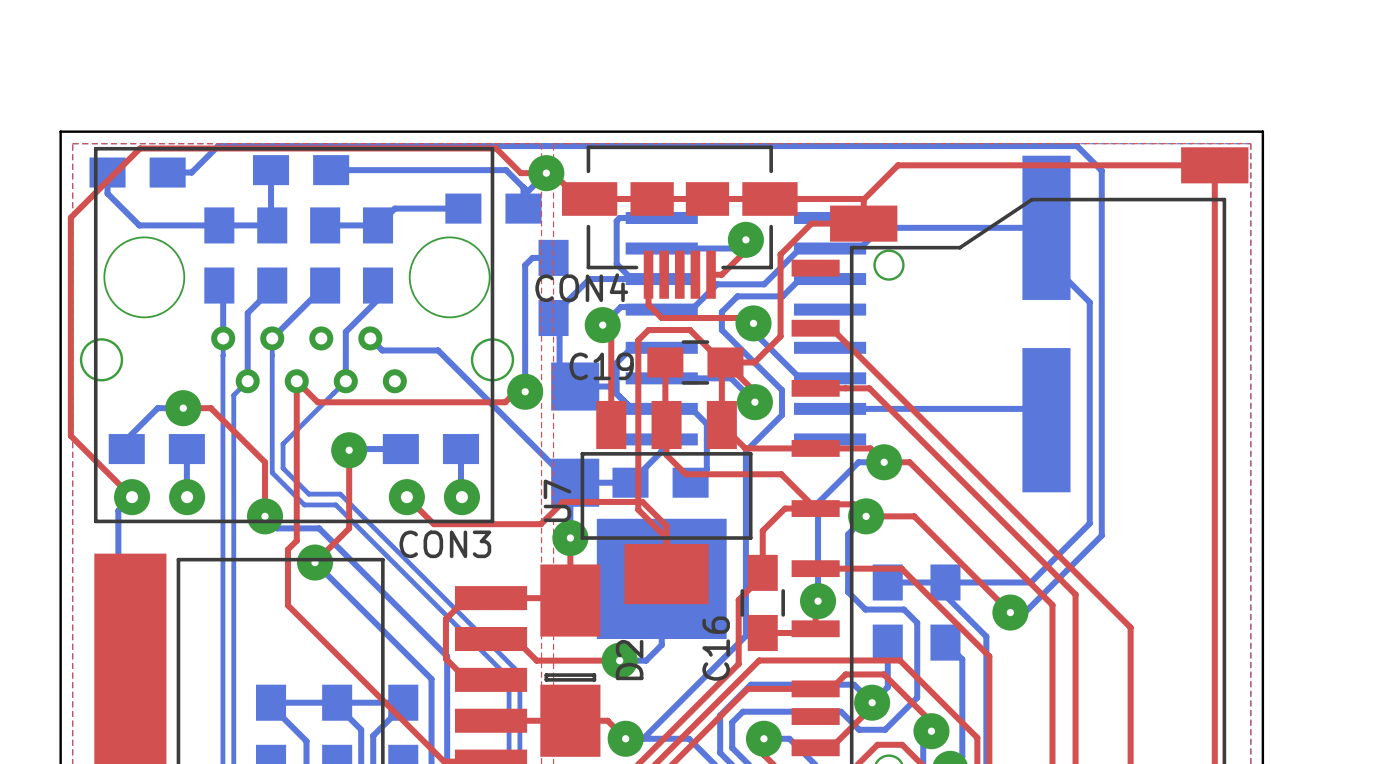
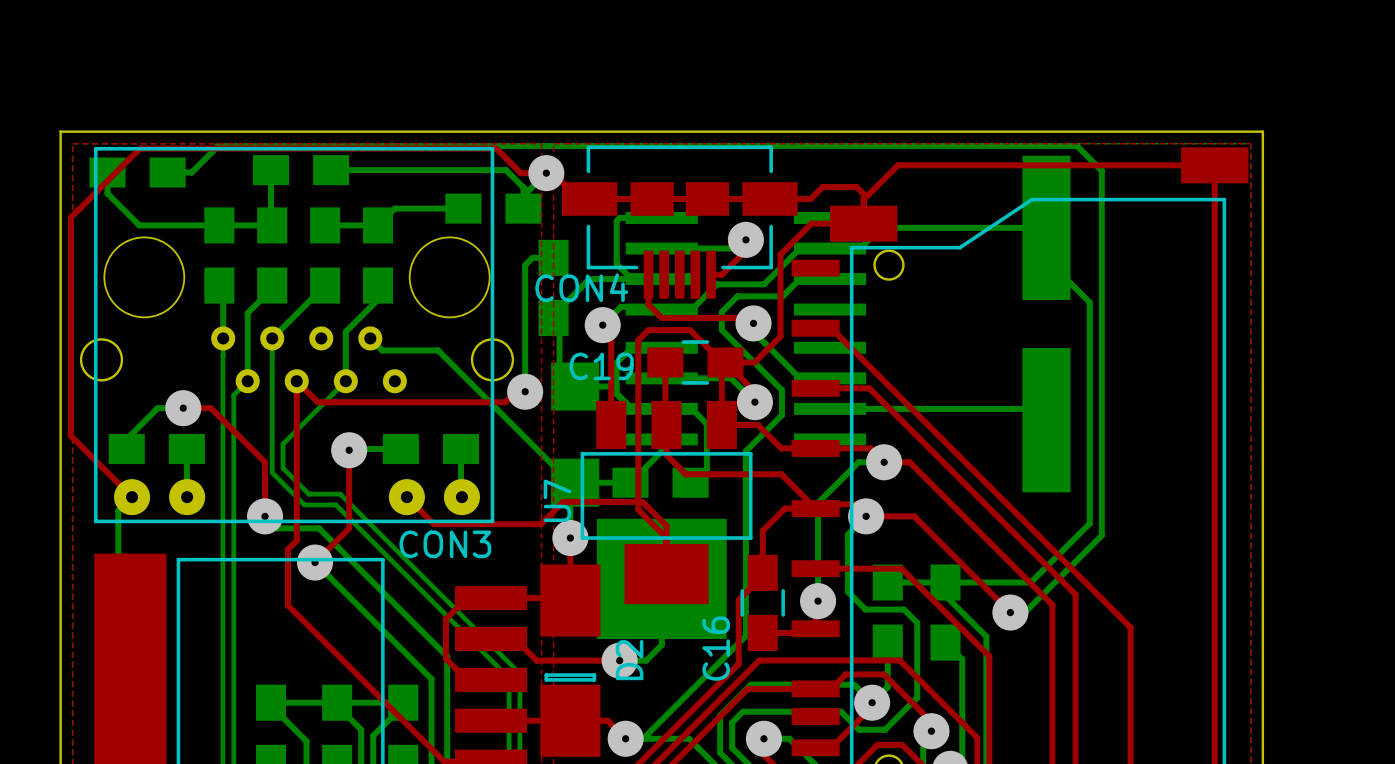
top track: (810, 198) (863, 199) -> (810, 198) (822, 186) (856, 186) (863, 194) (863, 199)
top track: (721, 425) (745, 448) (781, 448) -> (721, 425) (757, 425) (781, 448)

